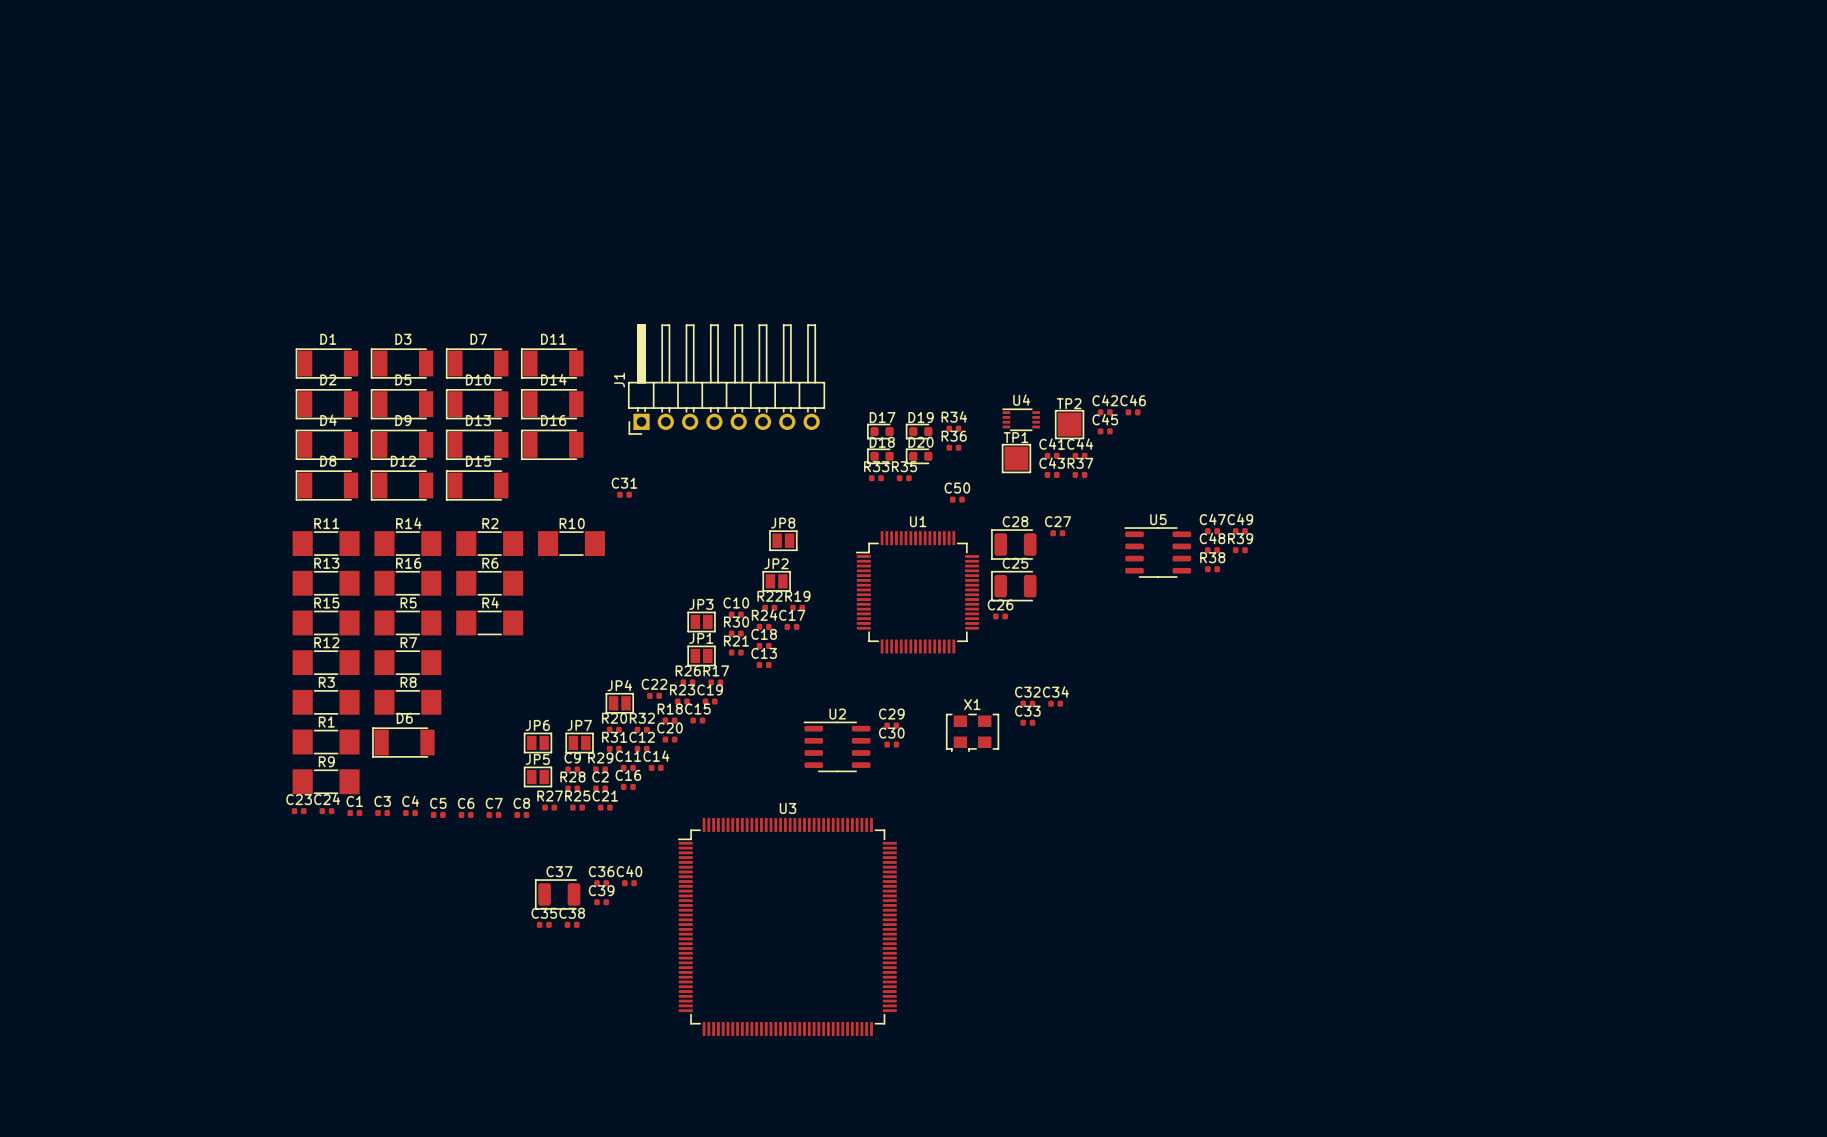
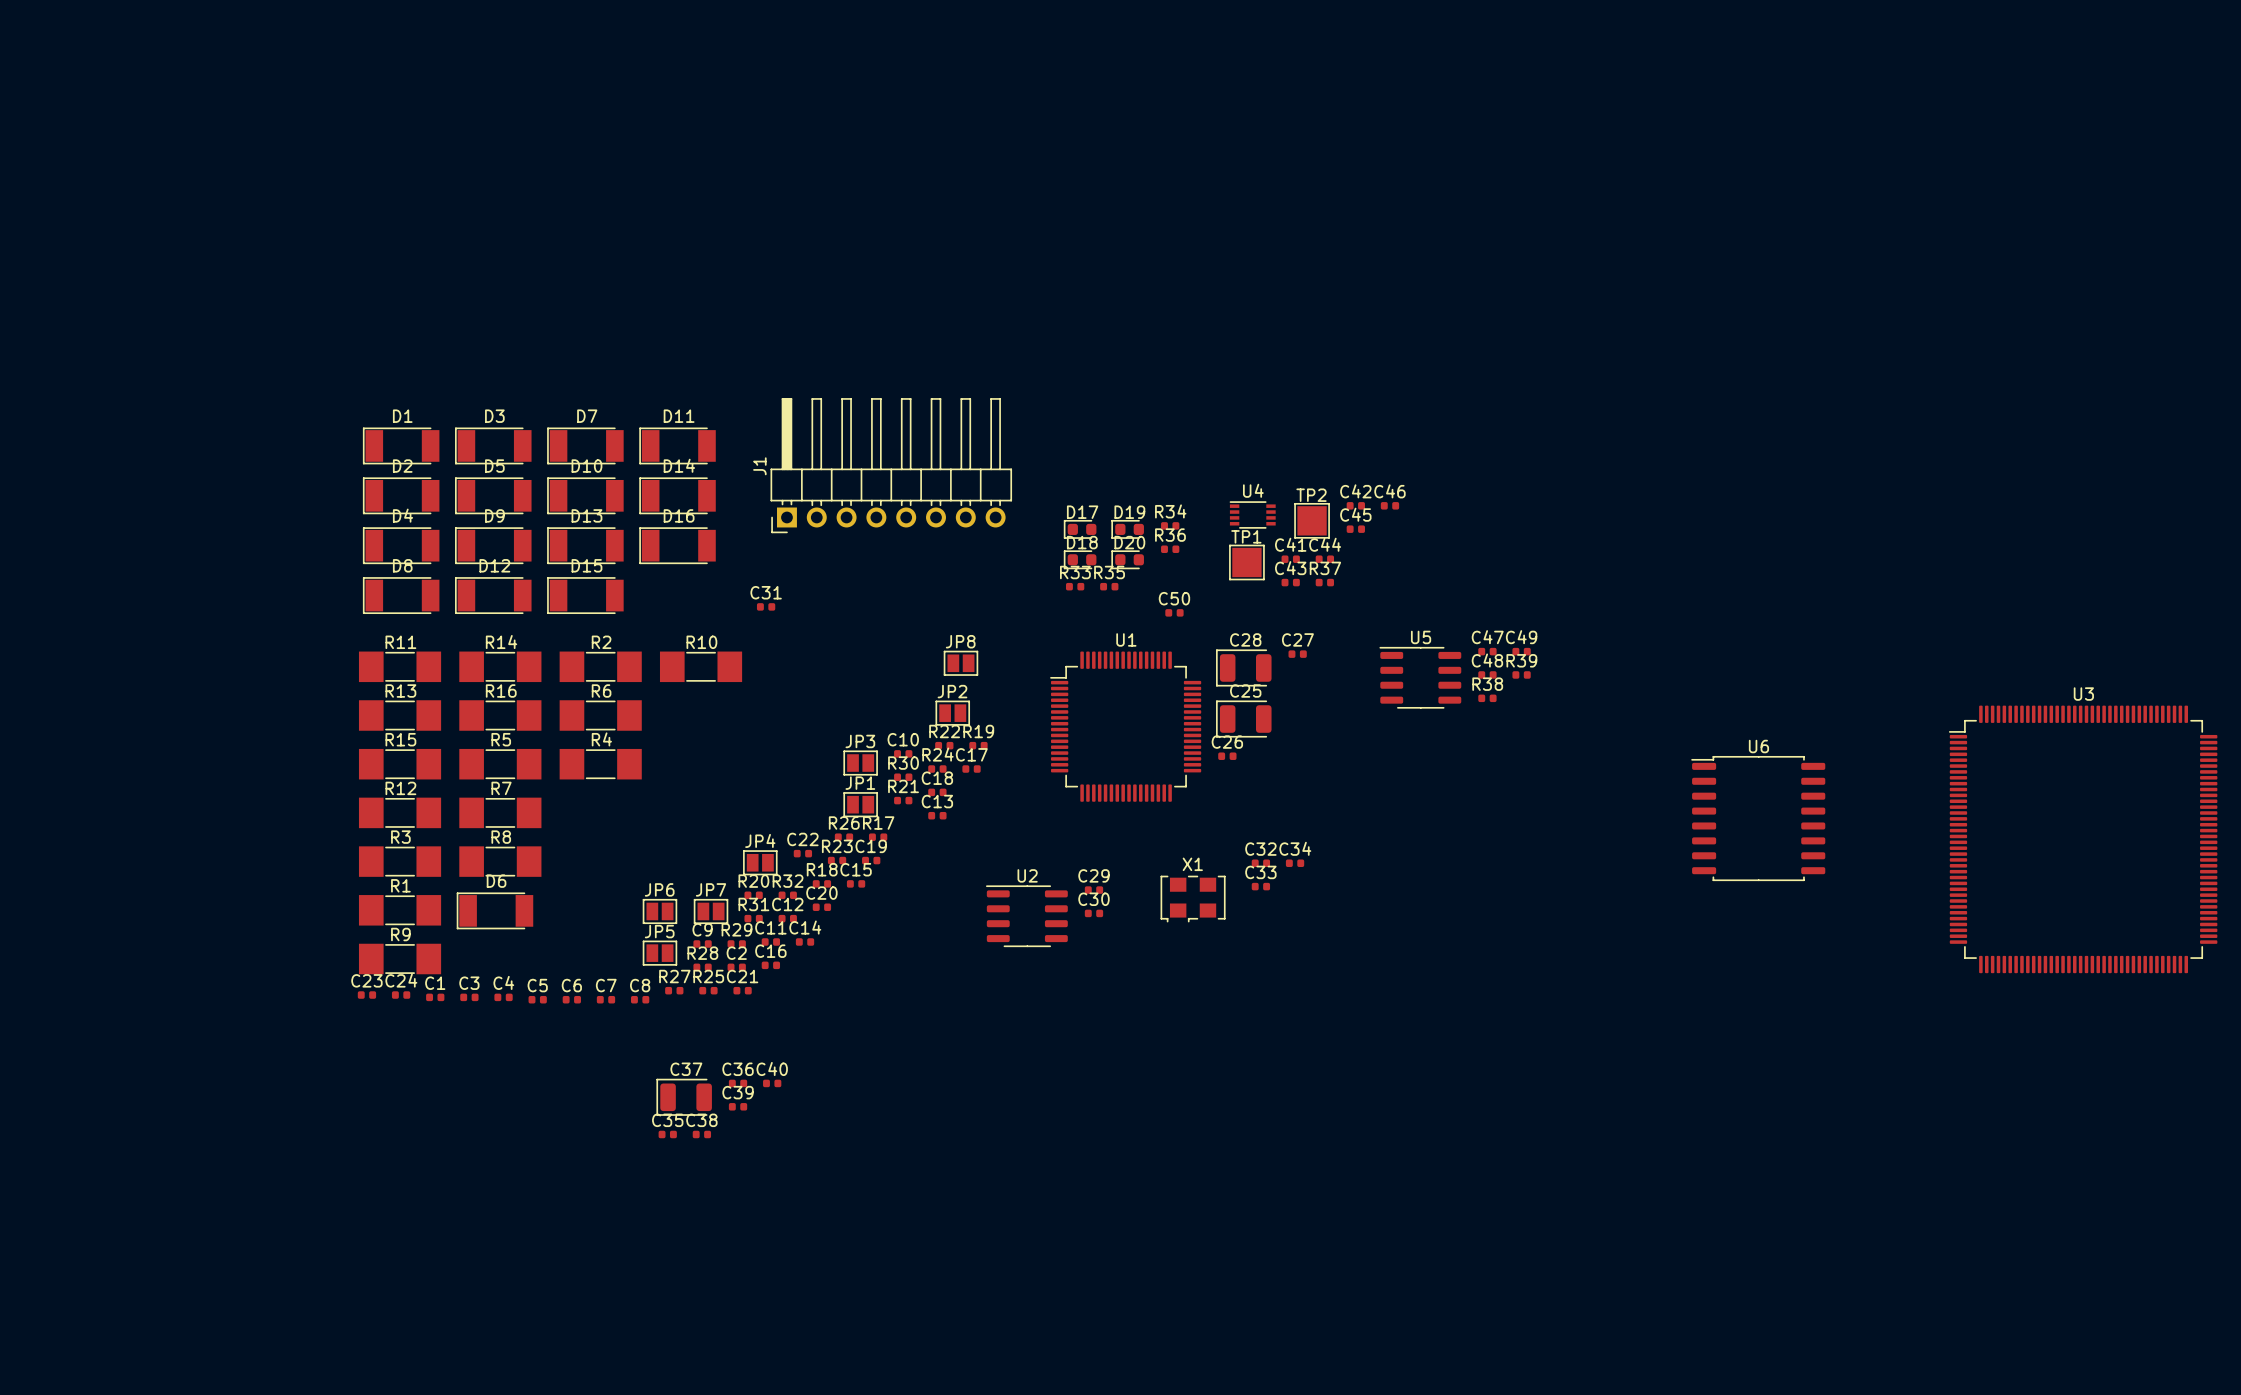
U6: none -> (1758, 818)
U3 position: (787, 926) -> (2083, 839)

